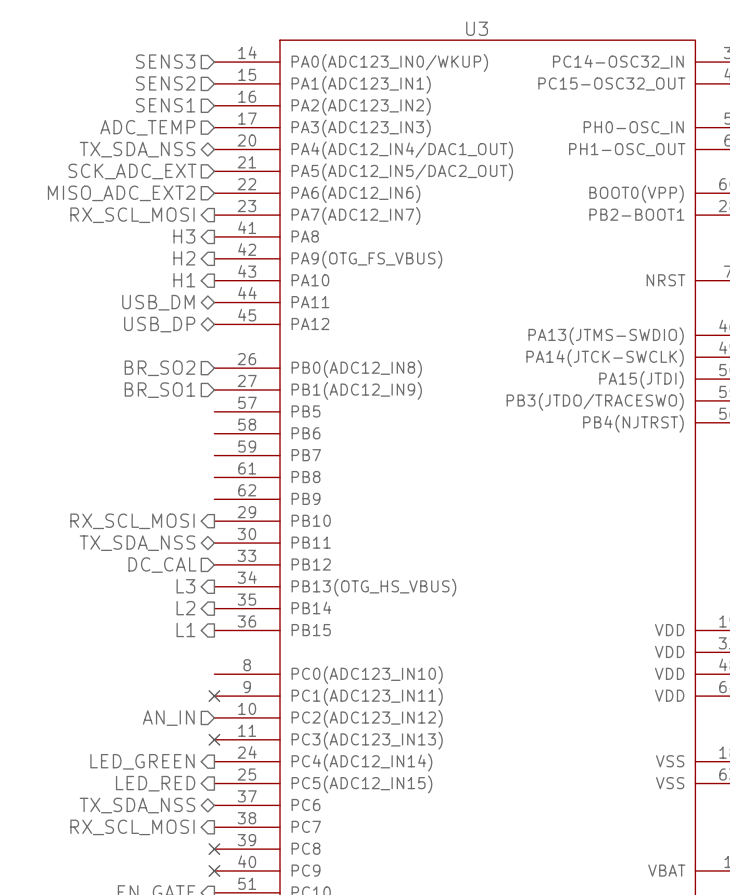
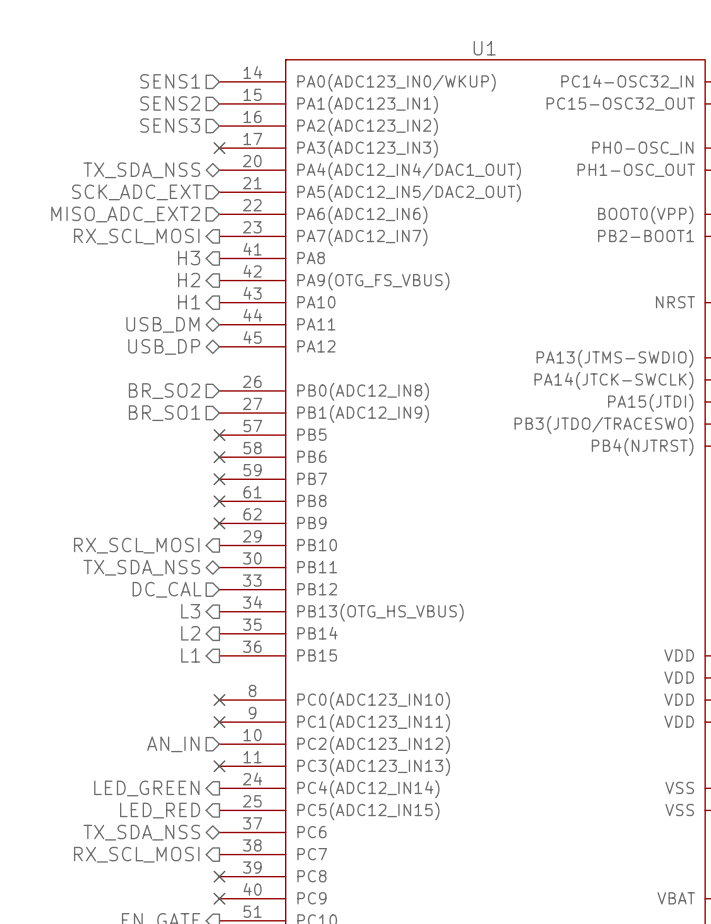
U3 name: U3 (477, 28) -> U1 (484, 48)
hierarchical label: SENS3 (165, 61) -> SENS1 (170, 81)
hierarchical label: SENS1 (165, 105) -> SENS3 (170, 125)
hierarchical label: ADC_TEMP (147, 127) -> none
no-connect mark: none -> (219, 148)
no-connect mark: none -> (219, 435)
no-connect mark: none -> (219, 457)
no-connect mark: none -> (219, 479)
no-connect mark: none -> (219, 501)
no-connect mark: none -> (219, 523)
no-connect mark: none -> (219, 700)

